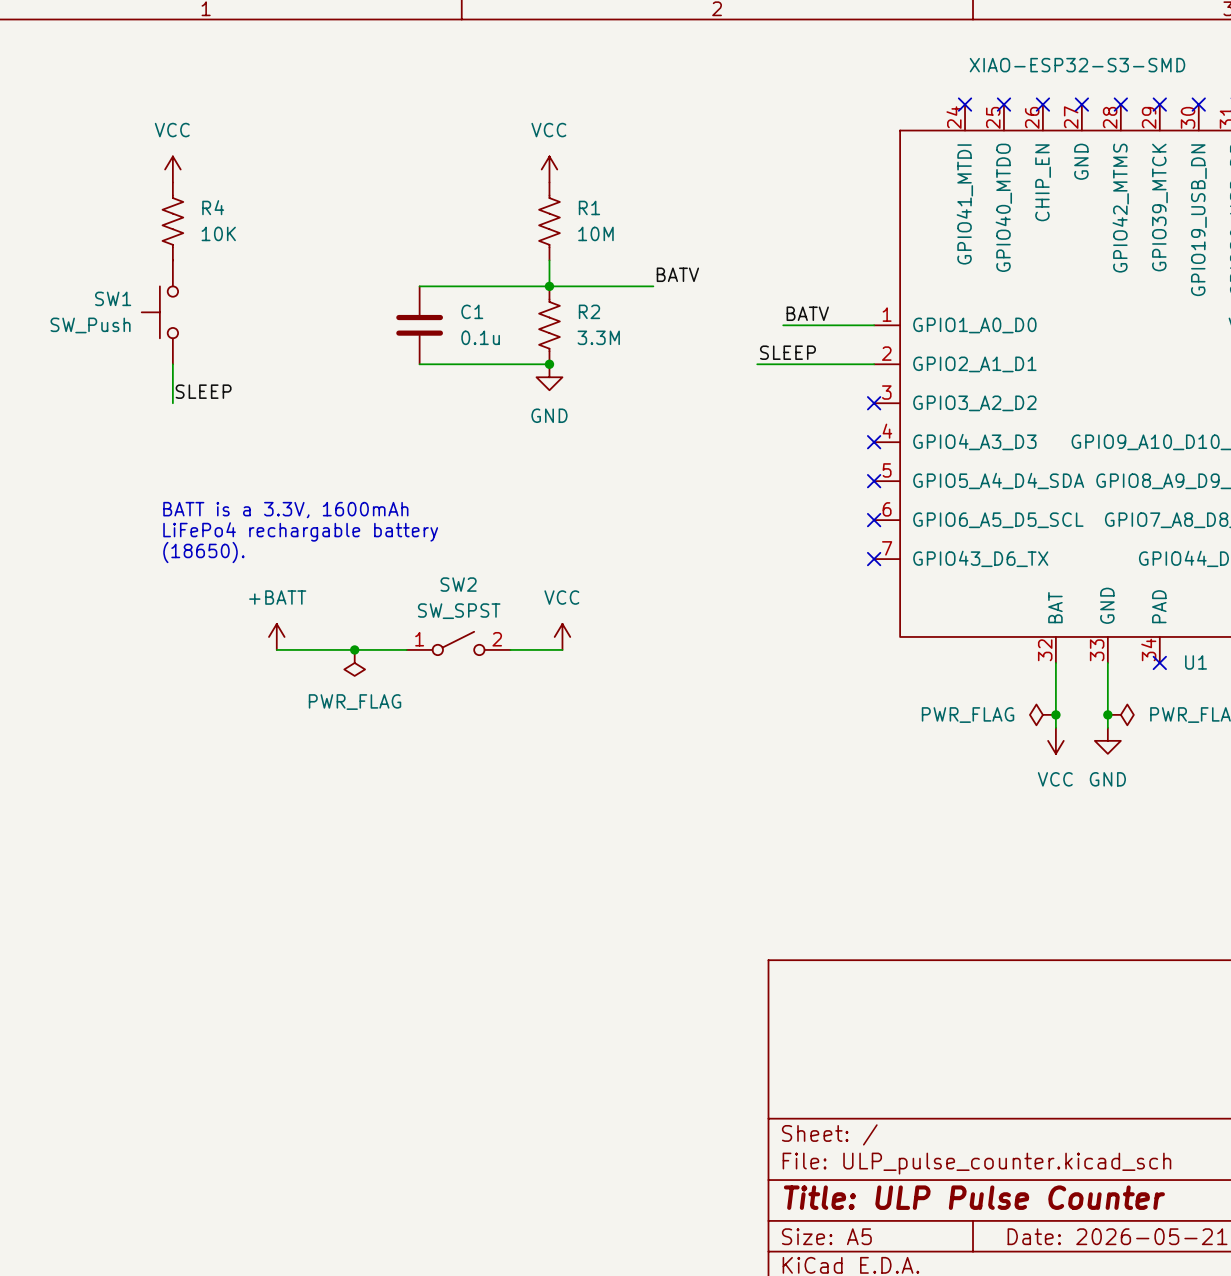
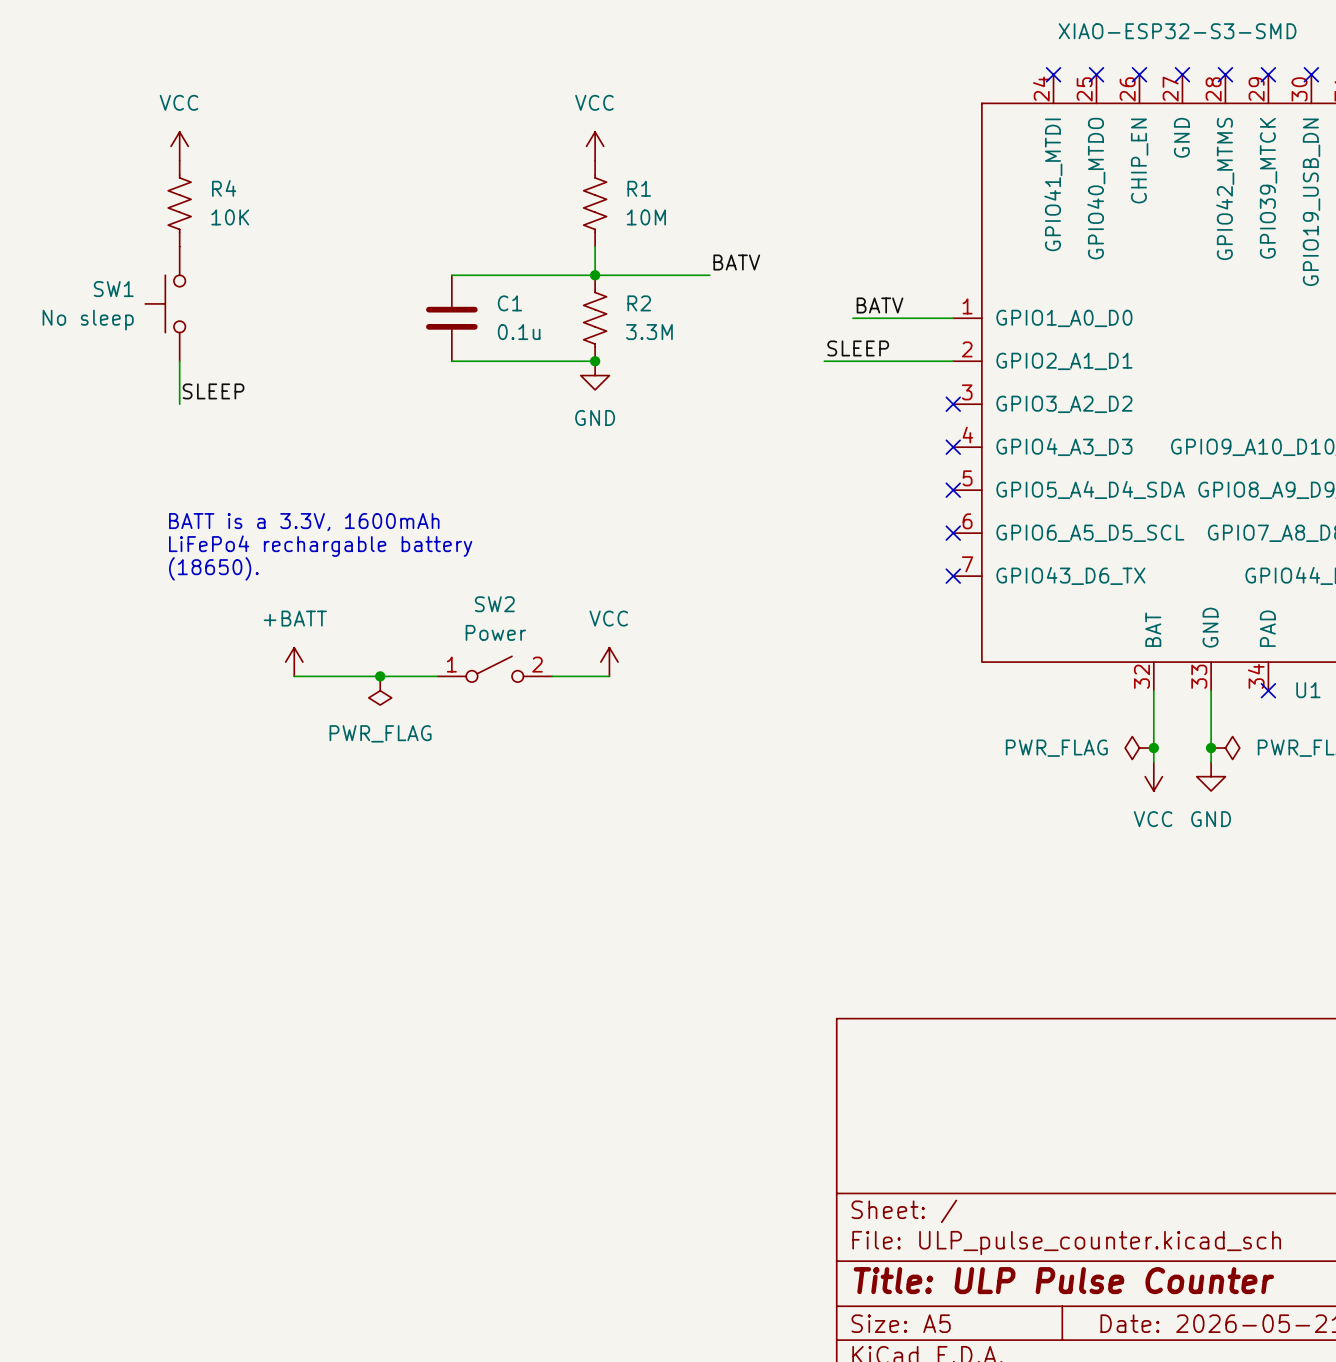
SW1 value: SW_Push (90, 325) -> No sleep (88, 320)
SW2 value: SW_SPST (459, 611) -> Power (495, 632)

